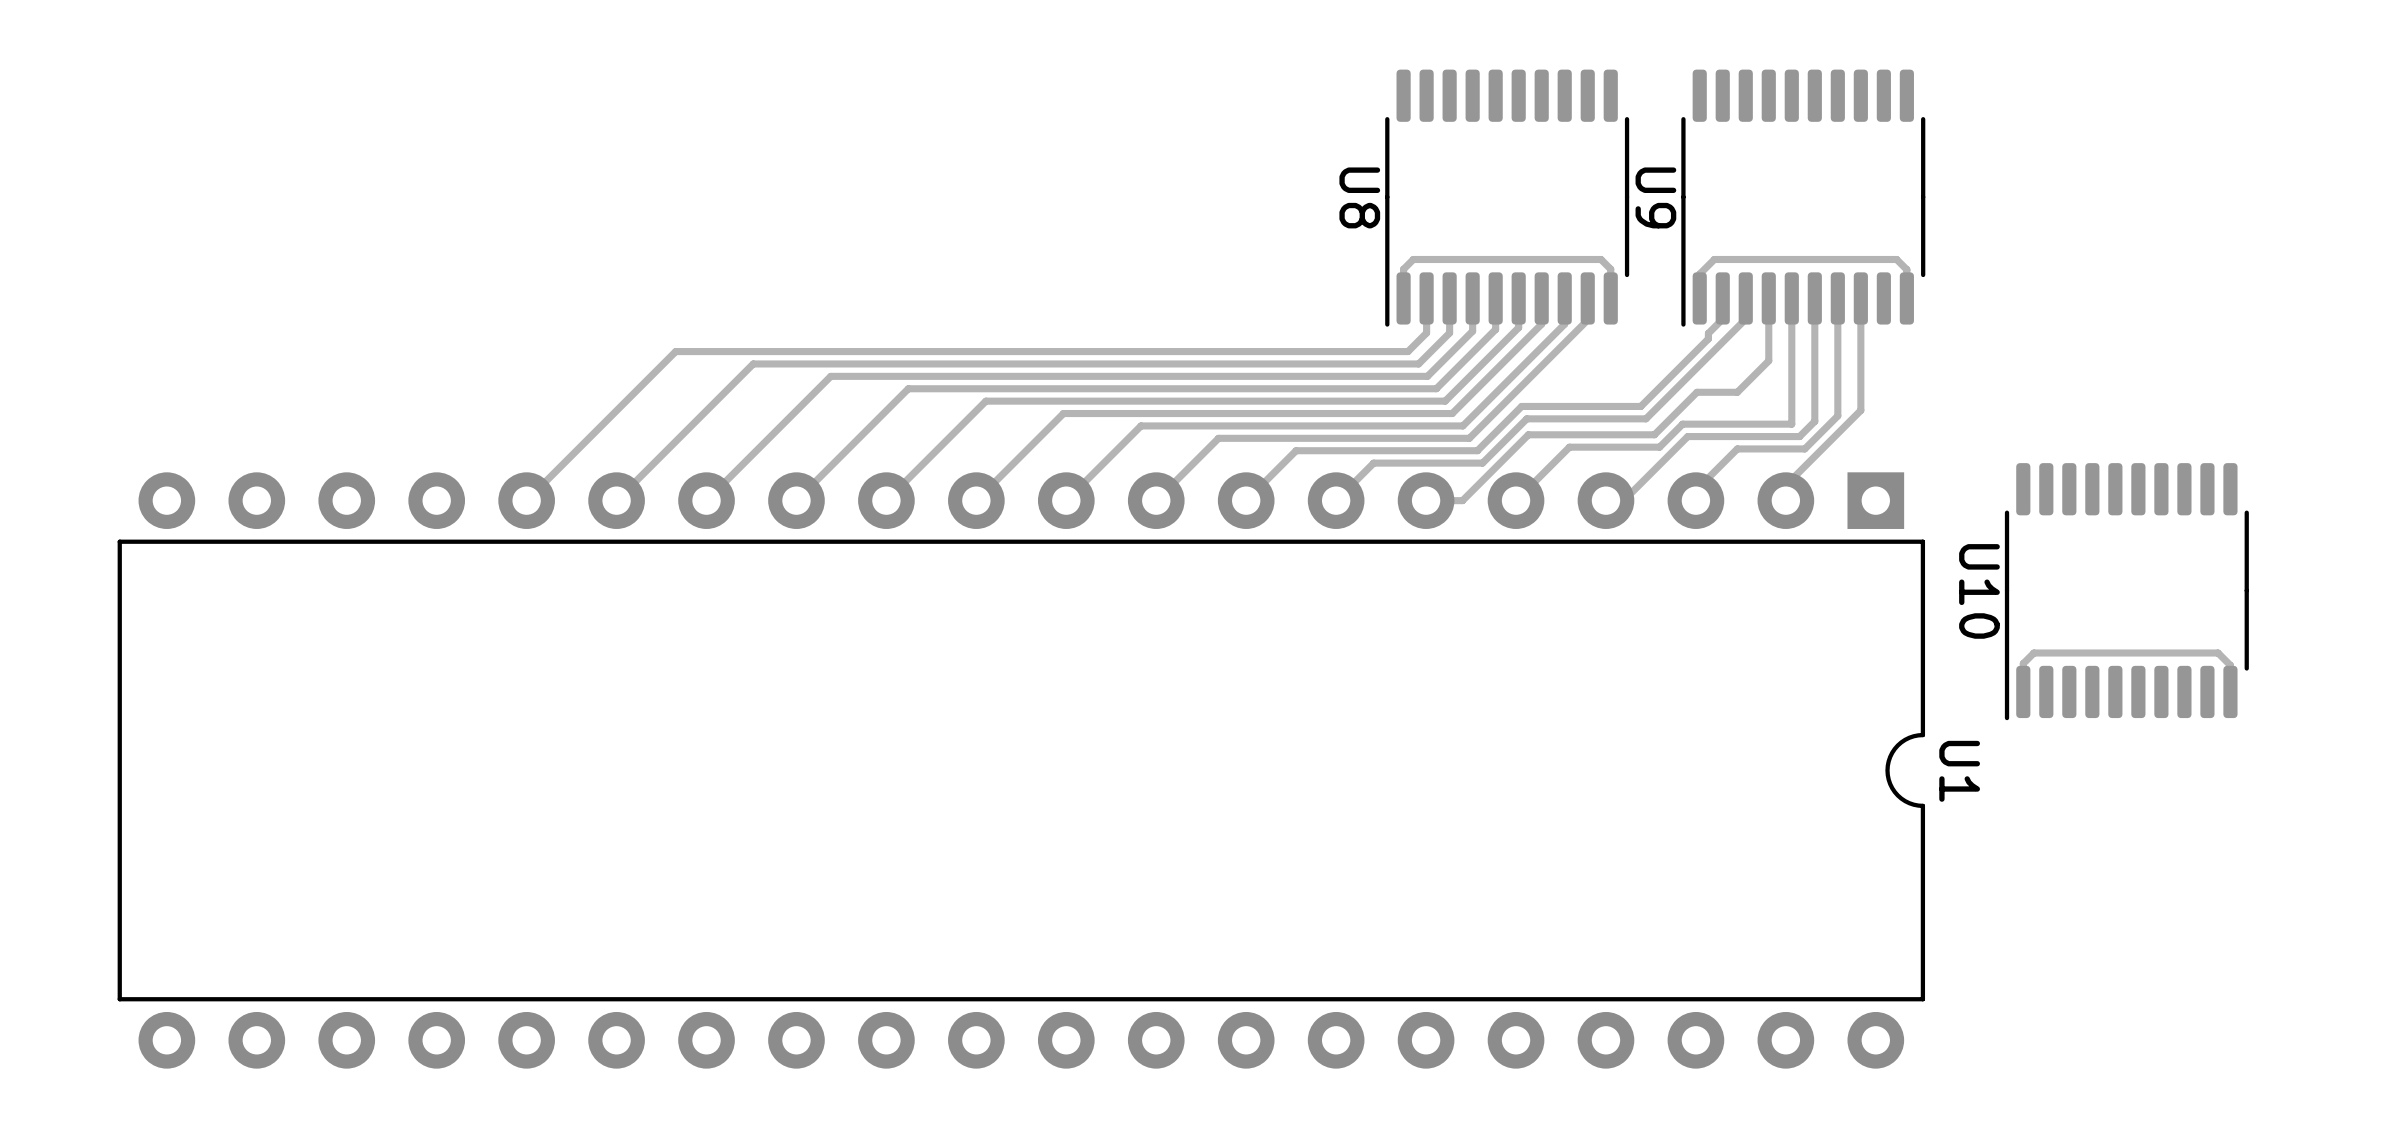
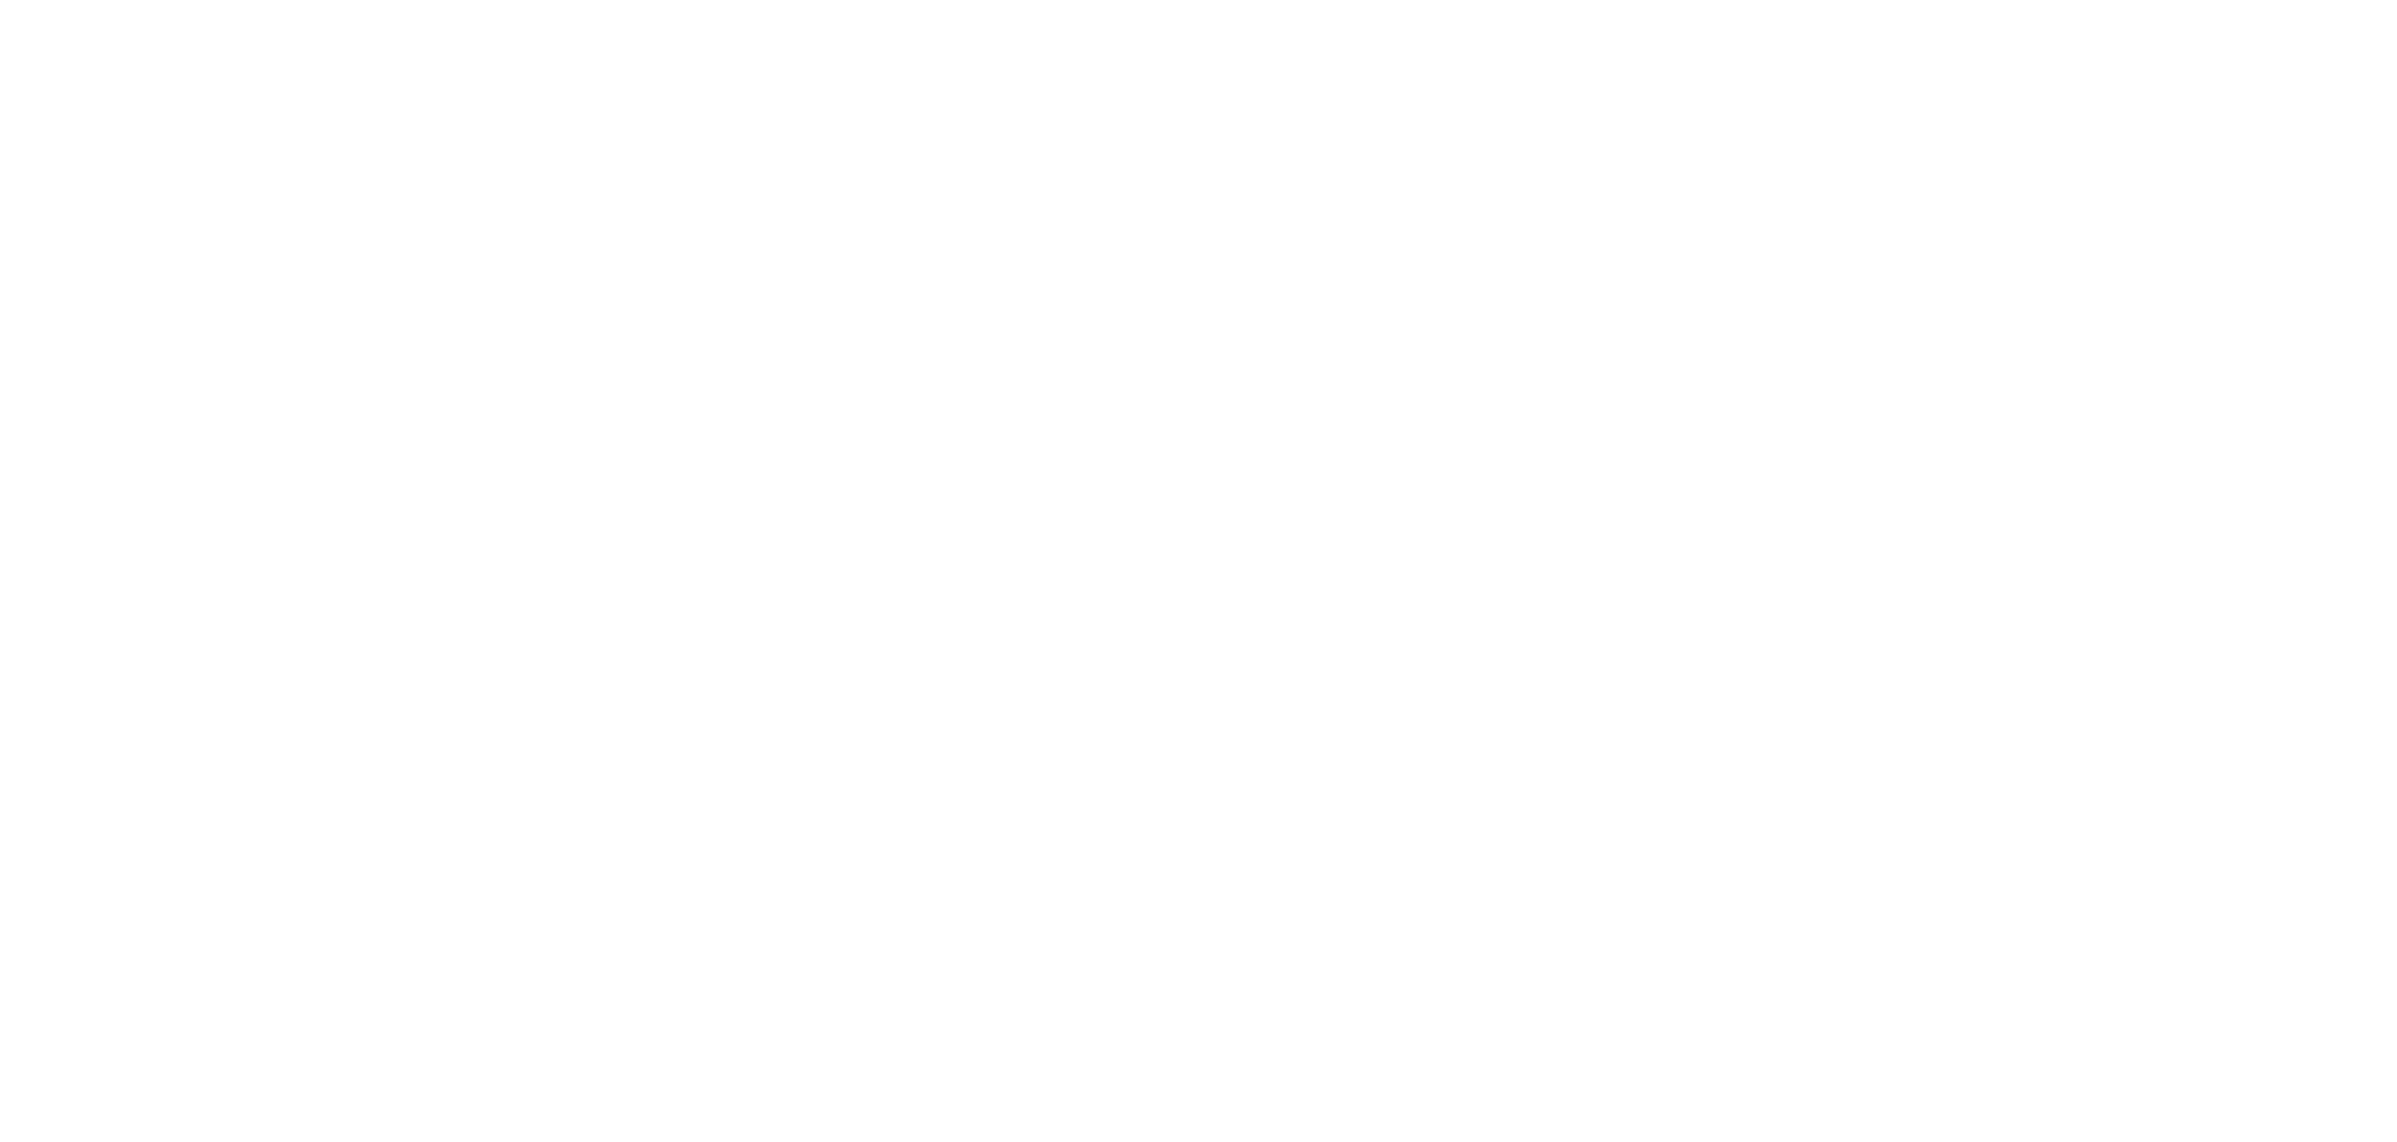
U8: (1507, 198) -> none
U9: (1803, 198) -> none
track: (1426, 298) (1426, 332) (1408, 351) (675, 351) (526, 500) -> none
track: (1449, 298) (1449, 332) (1418, 363) (753, 363) (616, 500) -> none
track: (1472, 298) (1472, 331) (1427, 376) (830, 376) (706, 500) -> none
track: (1495, 298) (1495, 329) (1436, 388) (908, 388) (796, 500) -> none
track: (1518, 298) (1518, 327) (1445, 401) (985, 401) (886, 500) -> none
track: (1541, 298) (1541, 324) (1452, 413) (1063, 413) (976, 500) -> none
track: (1564, 298) (1564, 324) (1462, 425) (1141, 425) (1066, 500) -> none
track: (1587, 298) (1587, 319) (1469, 438) (1218, 438) (1156, 500) -> none
track: (1610, 298) (1610, 269) (1601, 259) (1413, 259) (1403, 269) (1403, 298) -> none
track: (1722, 298) (1722, 319) (1708, 333) (1708, 338) (1640, 406) (1521, 406) (1477, 450) (1296, 450) (1246, 500) -> none
track: (1745, 298) (1745, 319) (1645, 418) (1526, 418) (1482, 463) (1373, 463) (1336, 500) -> none
track: (1768, 298) (1768, 360) (1737, 392) (1696, 392) (1654, 434) (1528, 434) (1462, 500) (1426, 500) -> none
track: (1791, 298) (1791, 424) (1682, 424) (1659, 447) (1569, 447) (1516, 500) -> none
track: (1814, 298) (1814, 421) (1799, 436) (1687, 436) (1623, 500) (1605, 500) -> none
track: (1837, 298) (1837, 415) (1804, 448) (1737, 448) (1695, 490) (1695, 500) -> none
track: (1860, 298) (1860, 410) (1785, 485) (1785, 500) -> none
track: (1906, 298) (1906, 269) (1896, 259) (1714, 259) (1699, 274) (1699, 298) -> none
U10: (2126, 591) -> none
track: (2230, 691) (2230, 665) (2218, 653) (2033, 653) (2023, 663) (2023, 691) -> none
U1: (1021, 770) -> none

